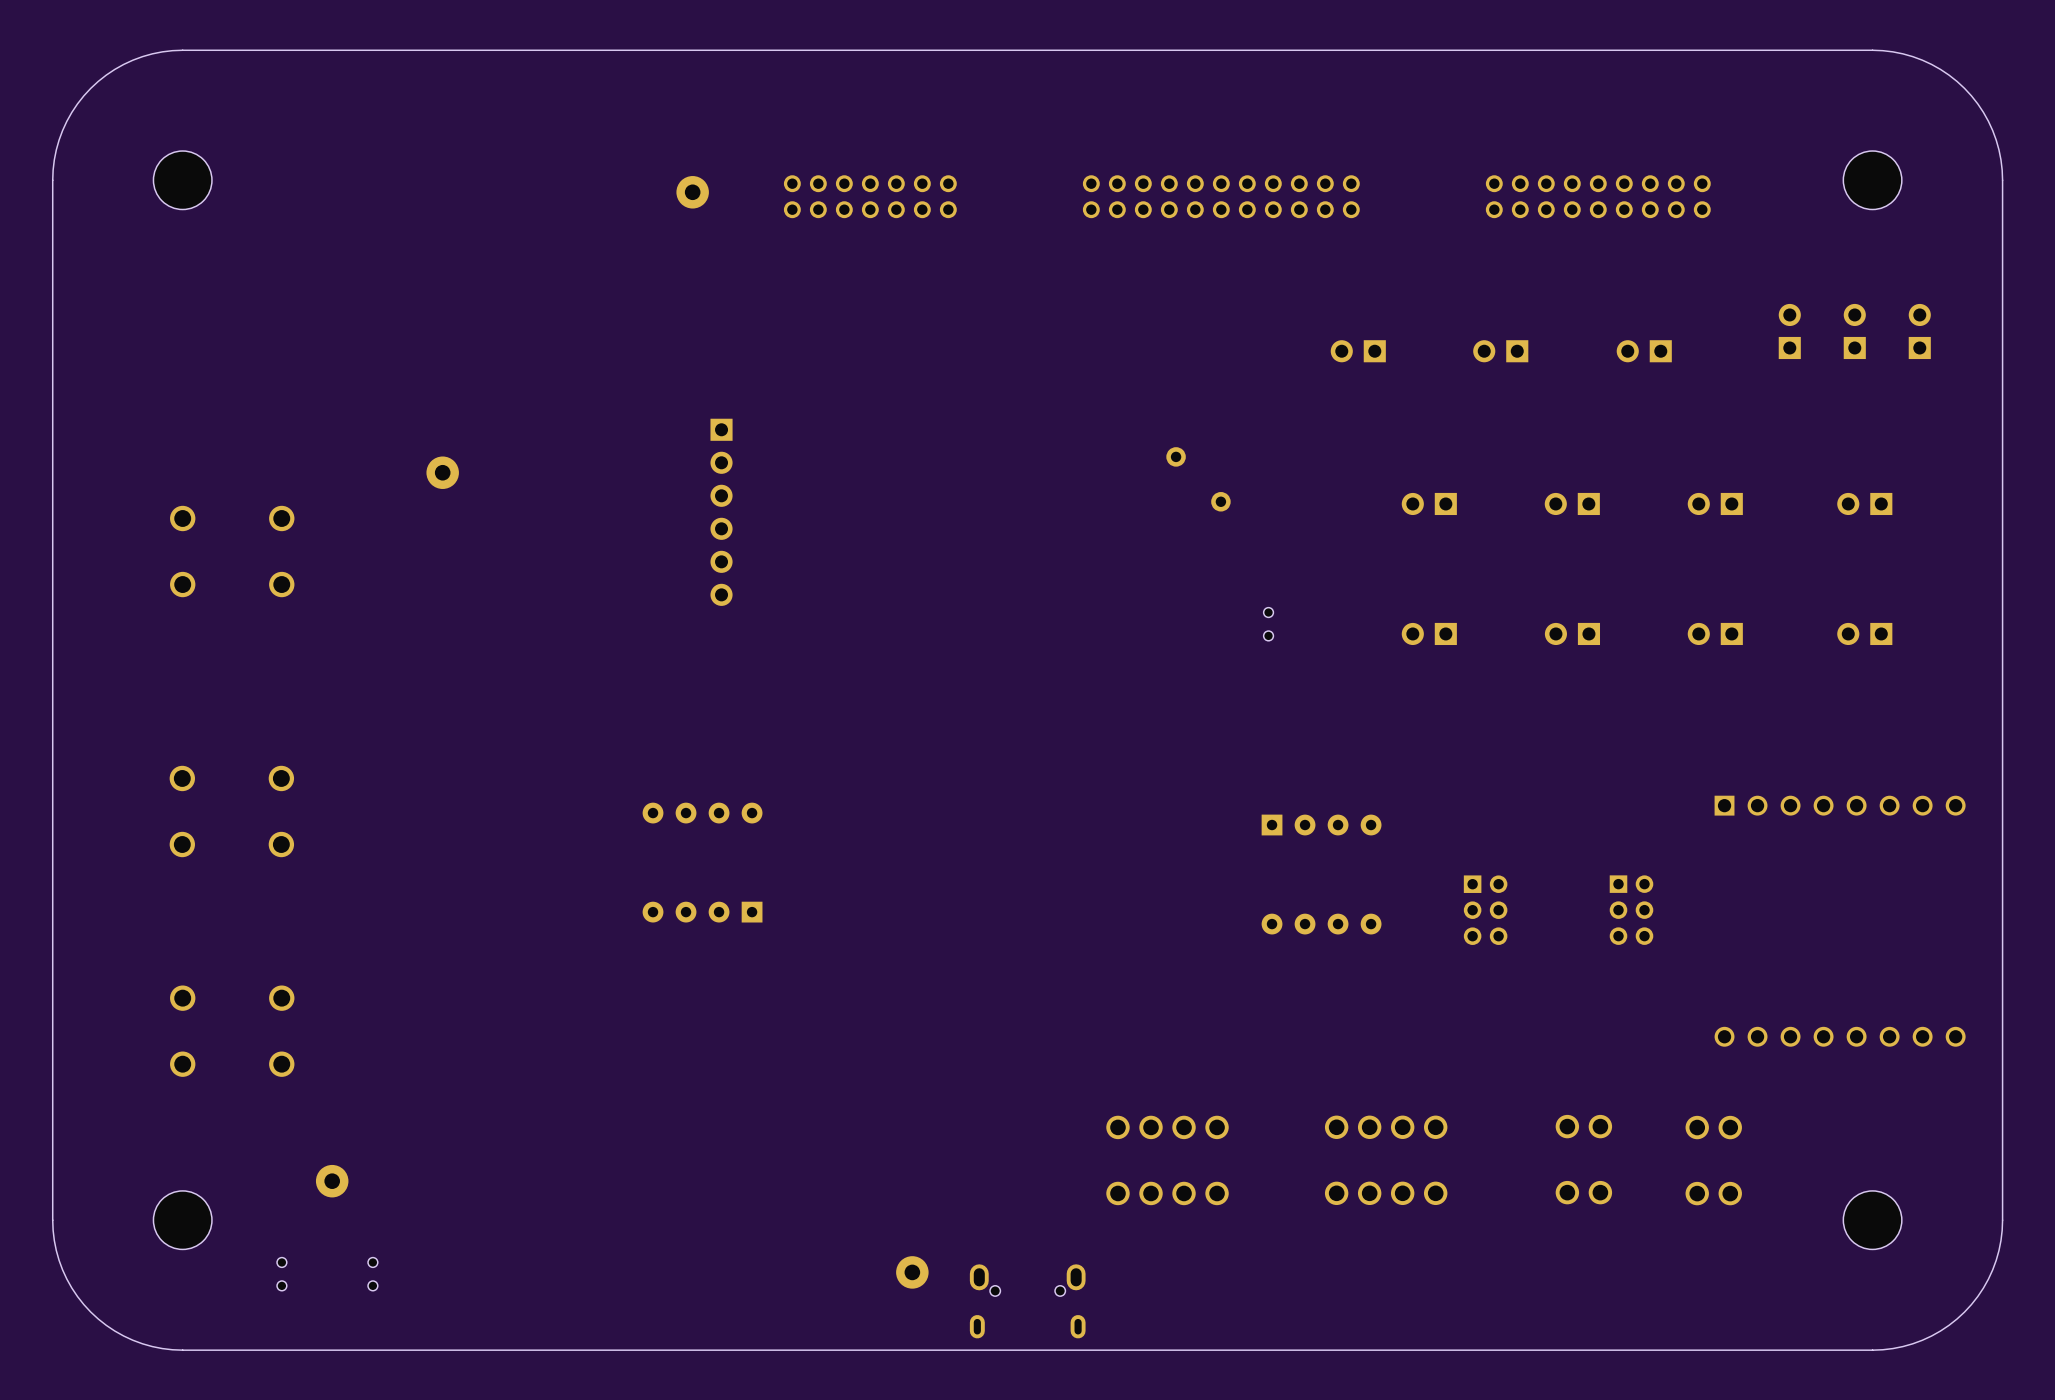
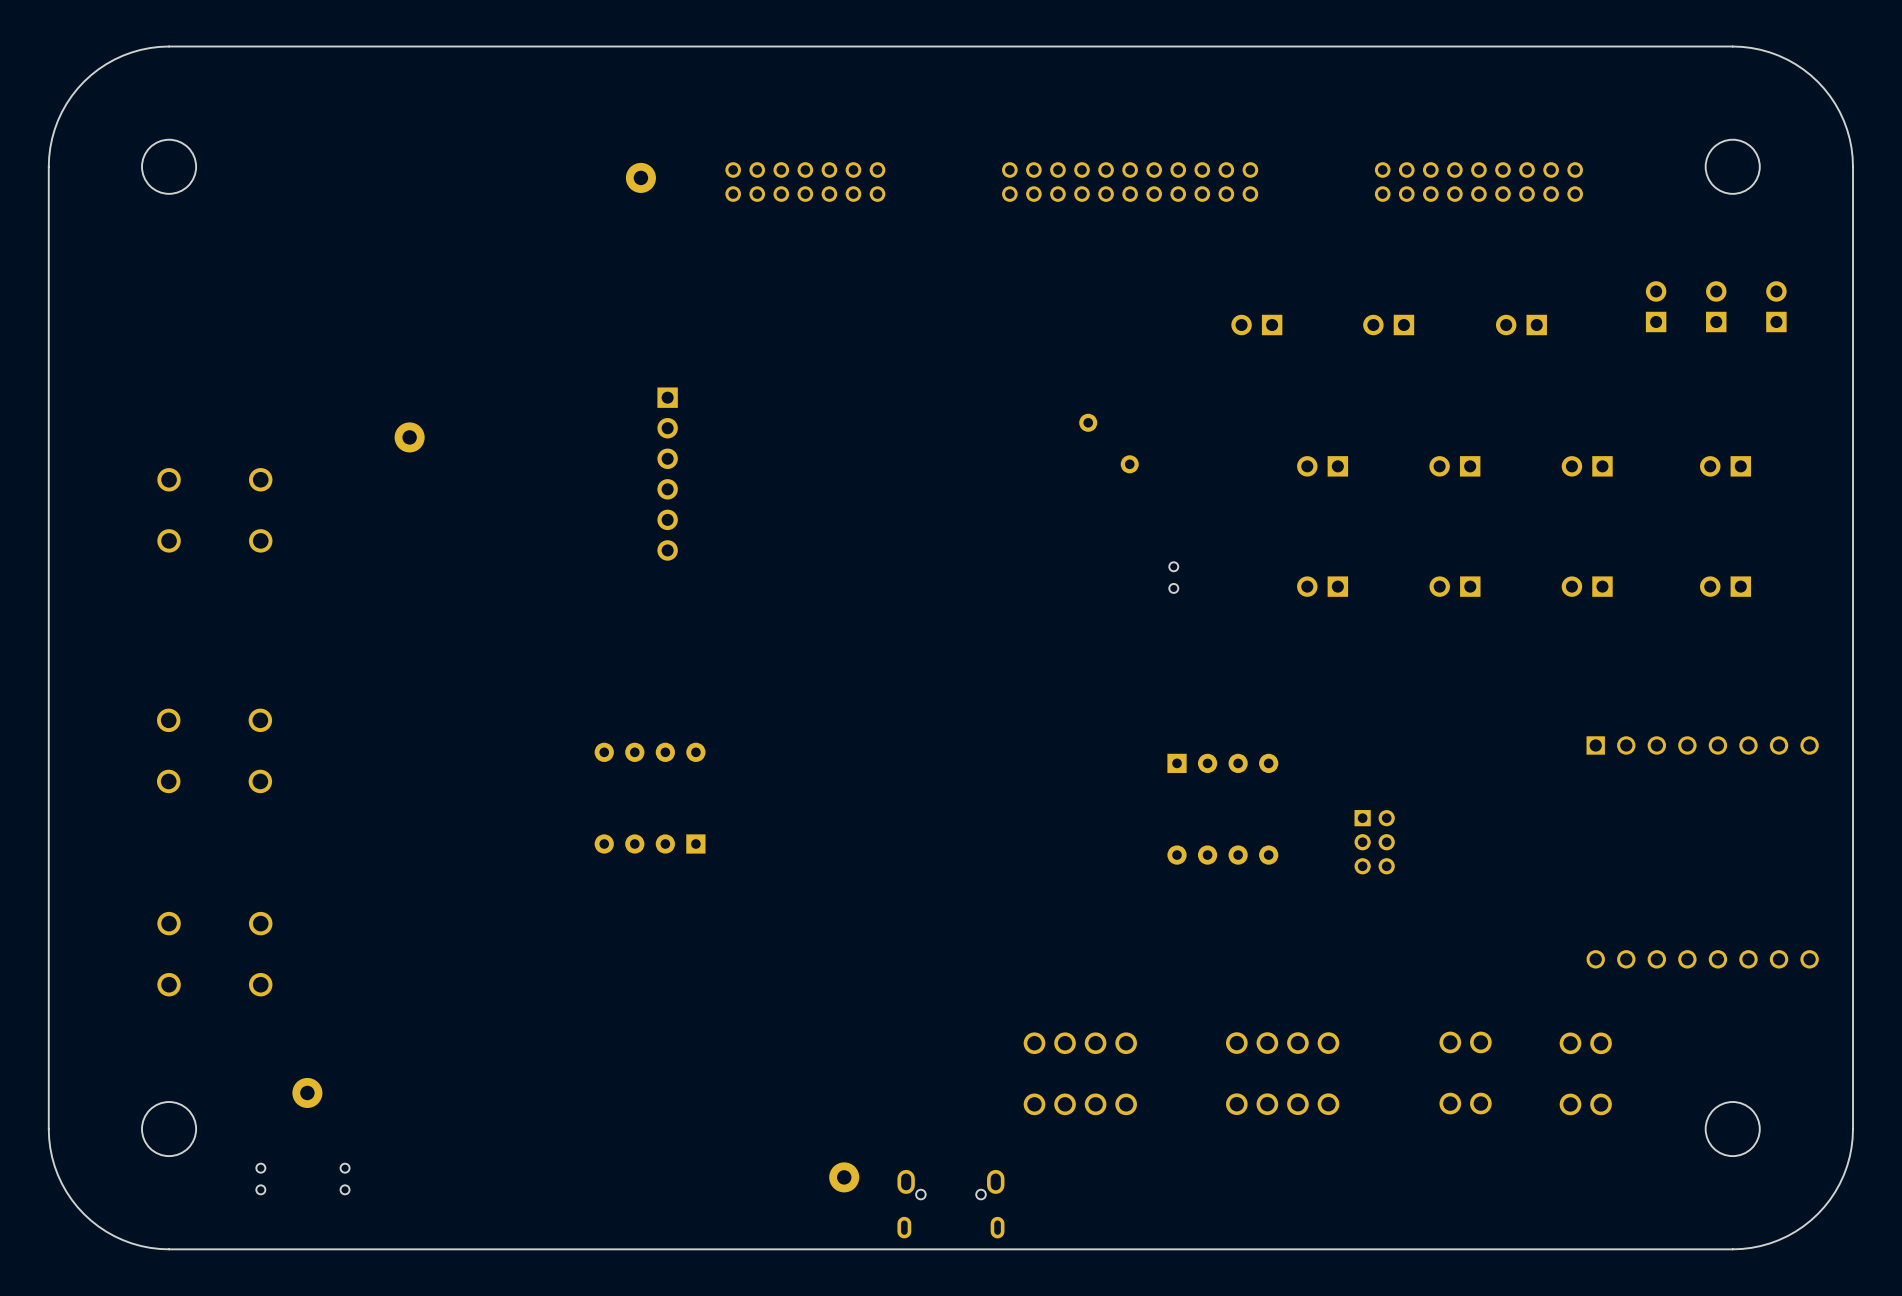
part: (1631, 910) -> none

